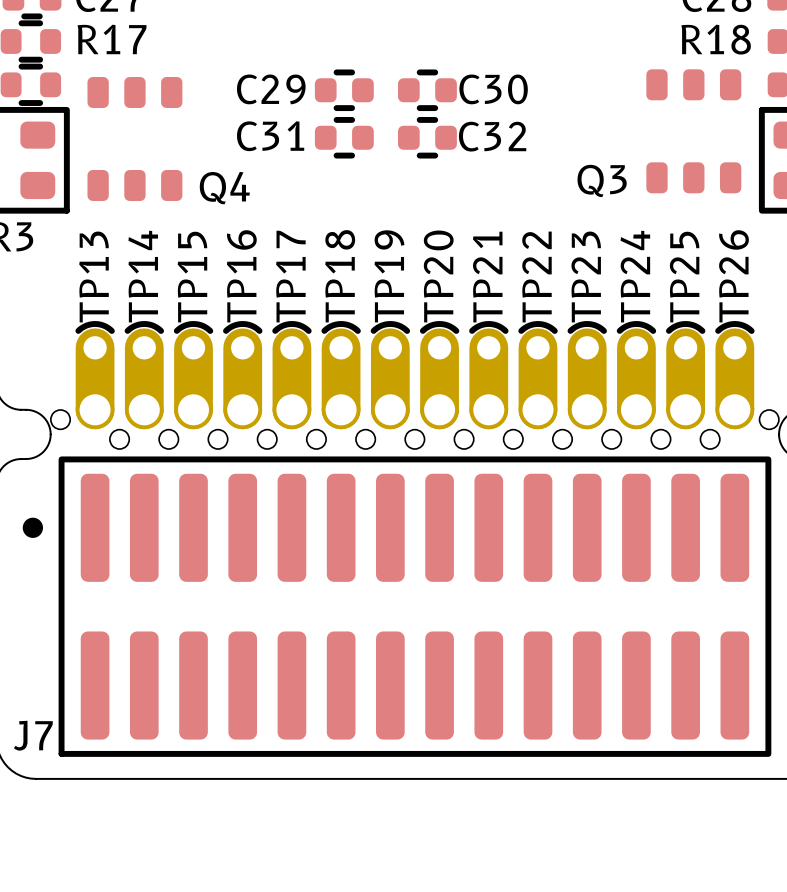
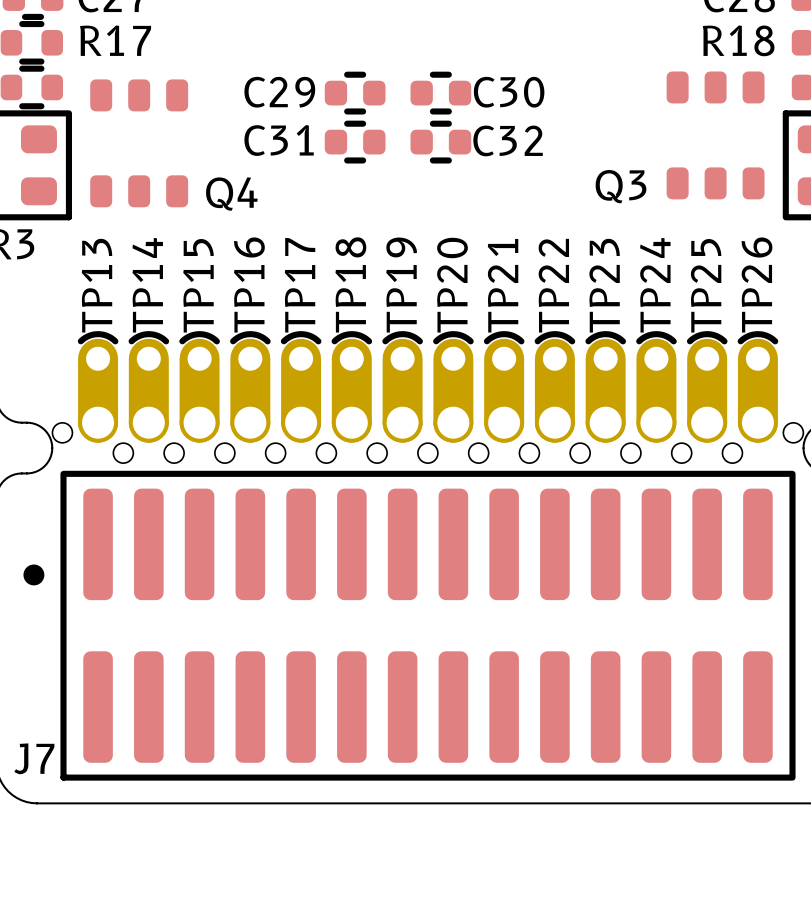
J7 footprint: [22, 456, 772, 757] -> [23, 470, 796, 781]

